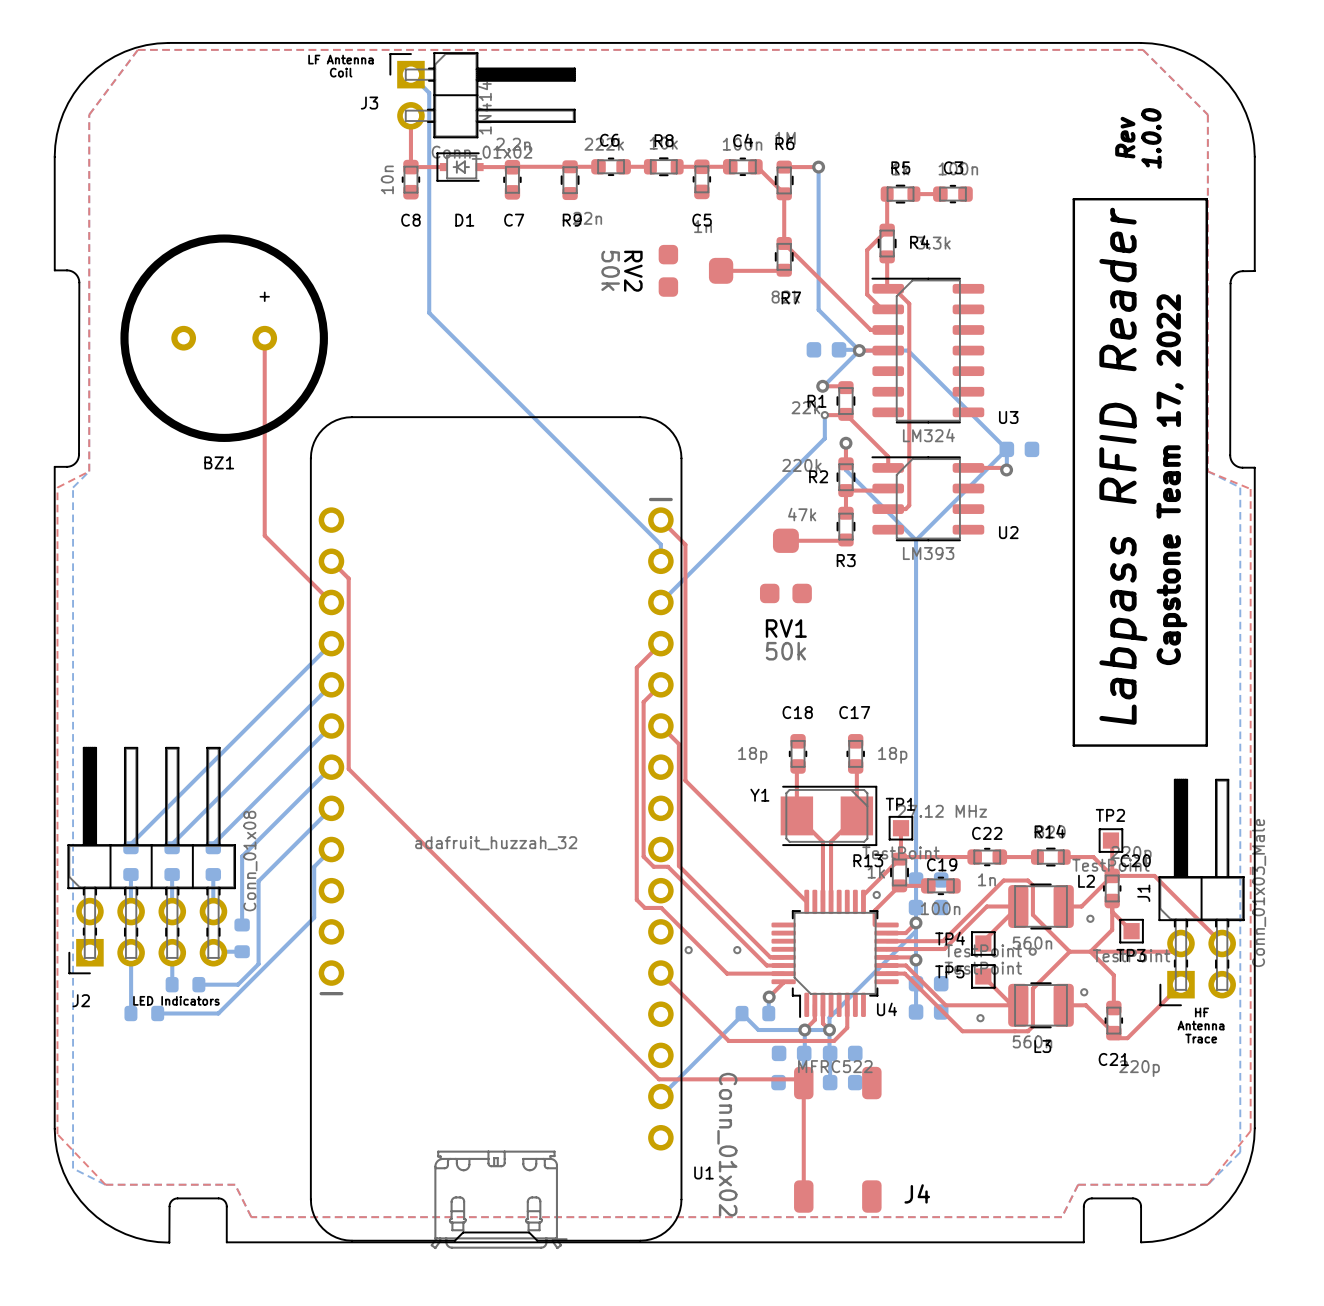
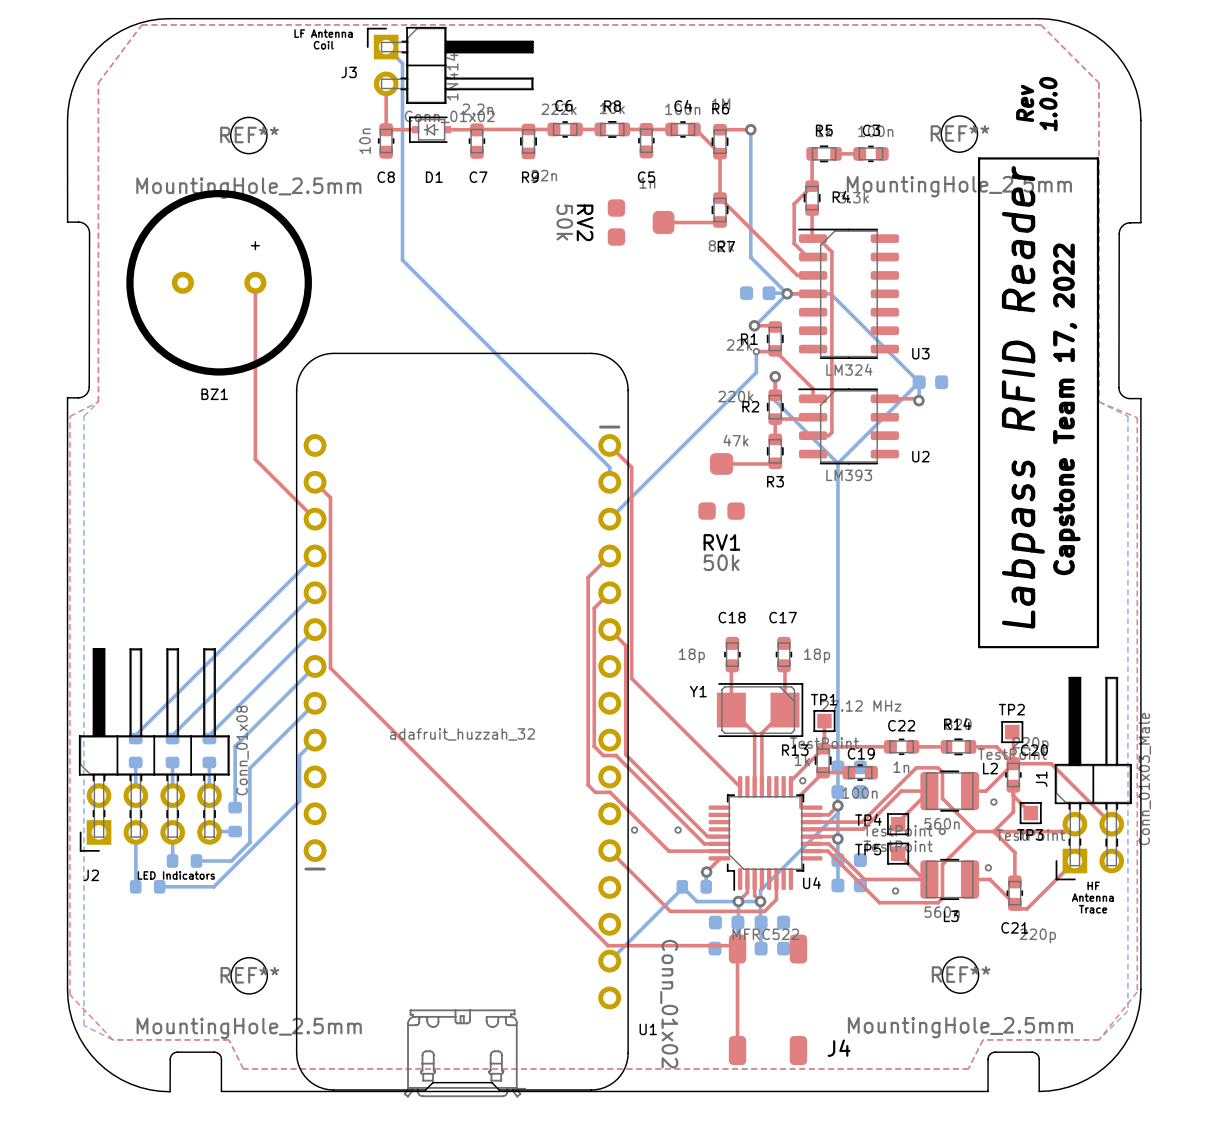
REF**: none -> MountingHole_2.5mm (959, 134)
REF**: none -> MountingHole_2.5mm (248, 135)
REF**: none -> MountingHole_2.5mm (960, 975)
REF**: none -> MountingHole_2.5mm (249, 975)

